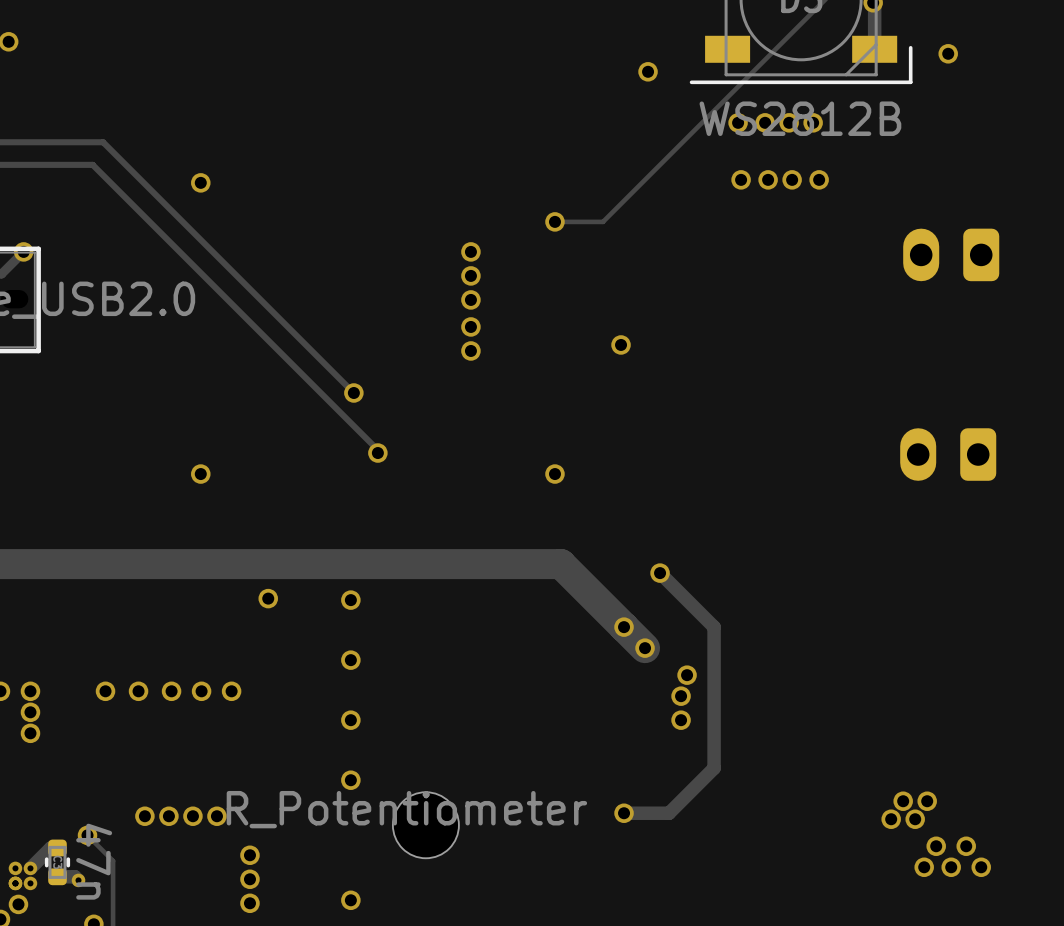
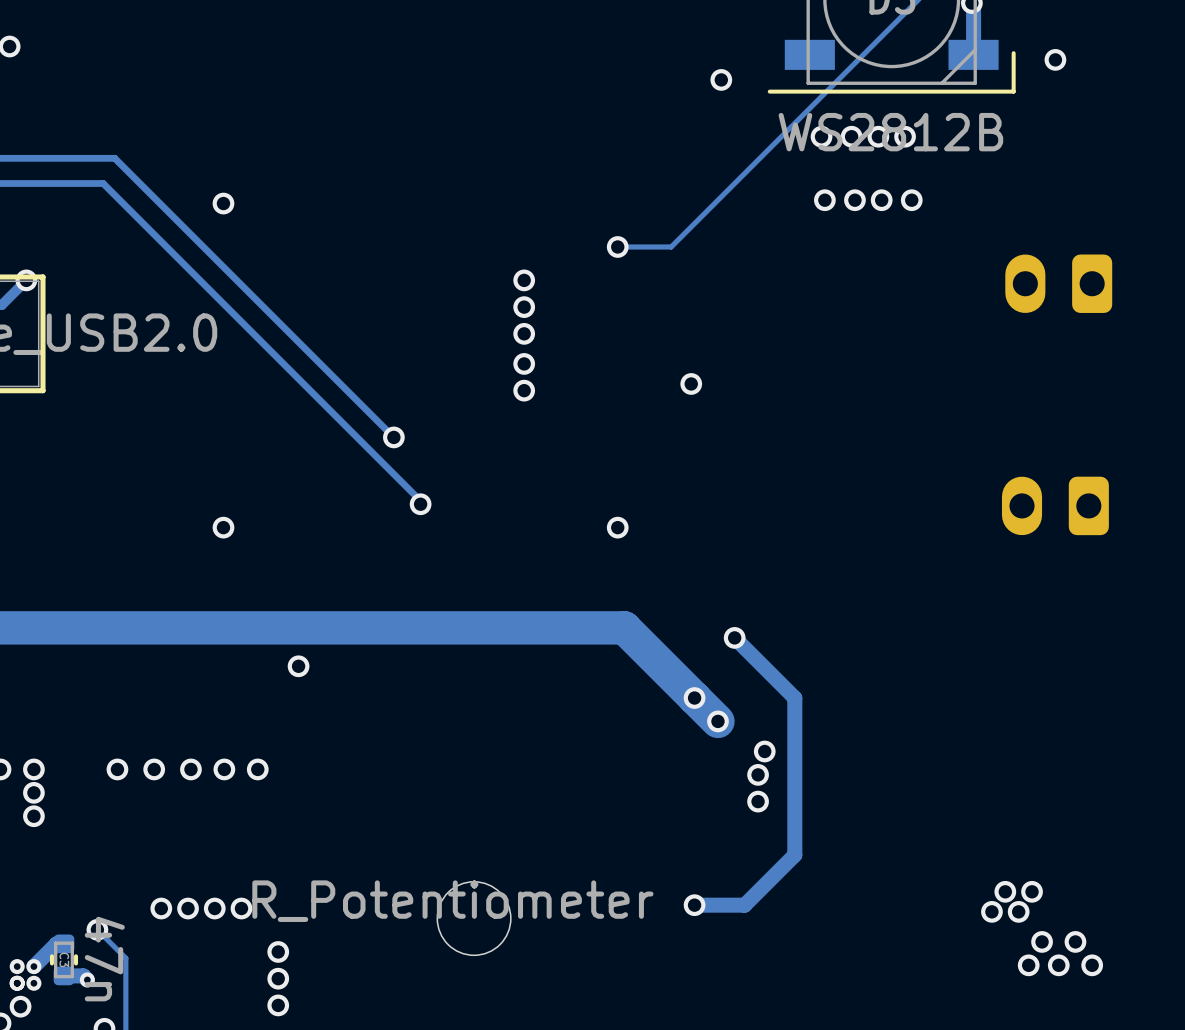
via: (350, 600) -> none
via: (350, 660) -> none
via: (350, 720) -> none
via: (350, 780) -> none
via: (350, 900) -> none

